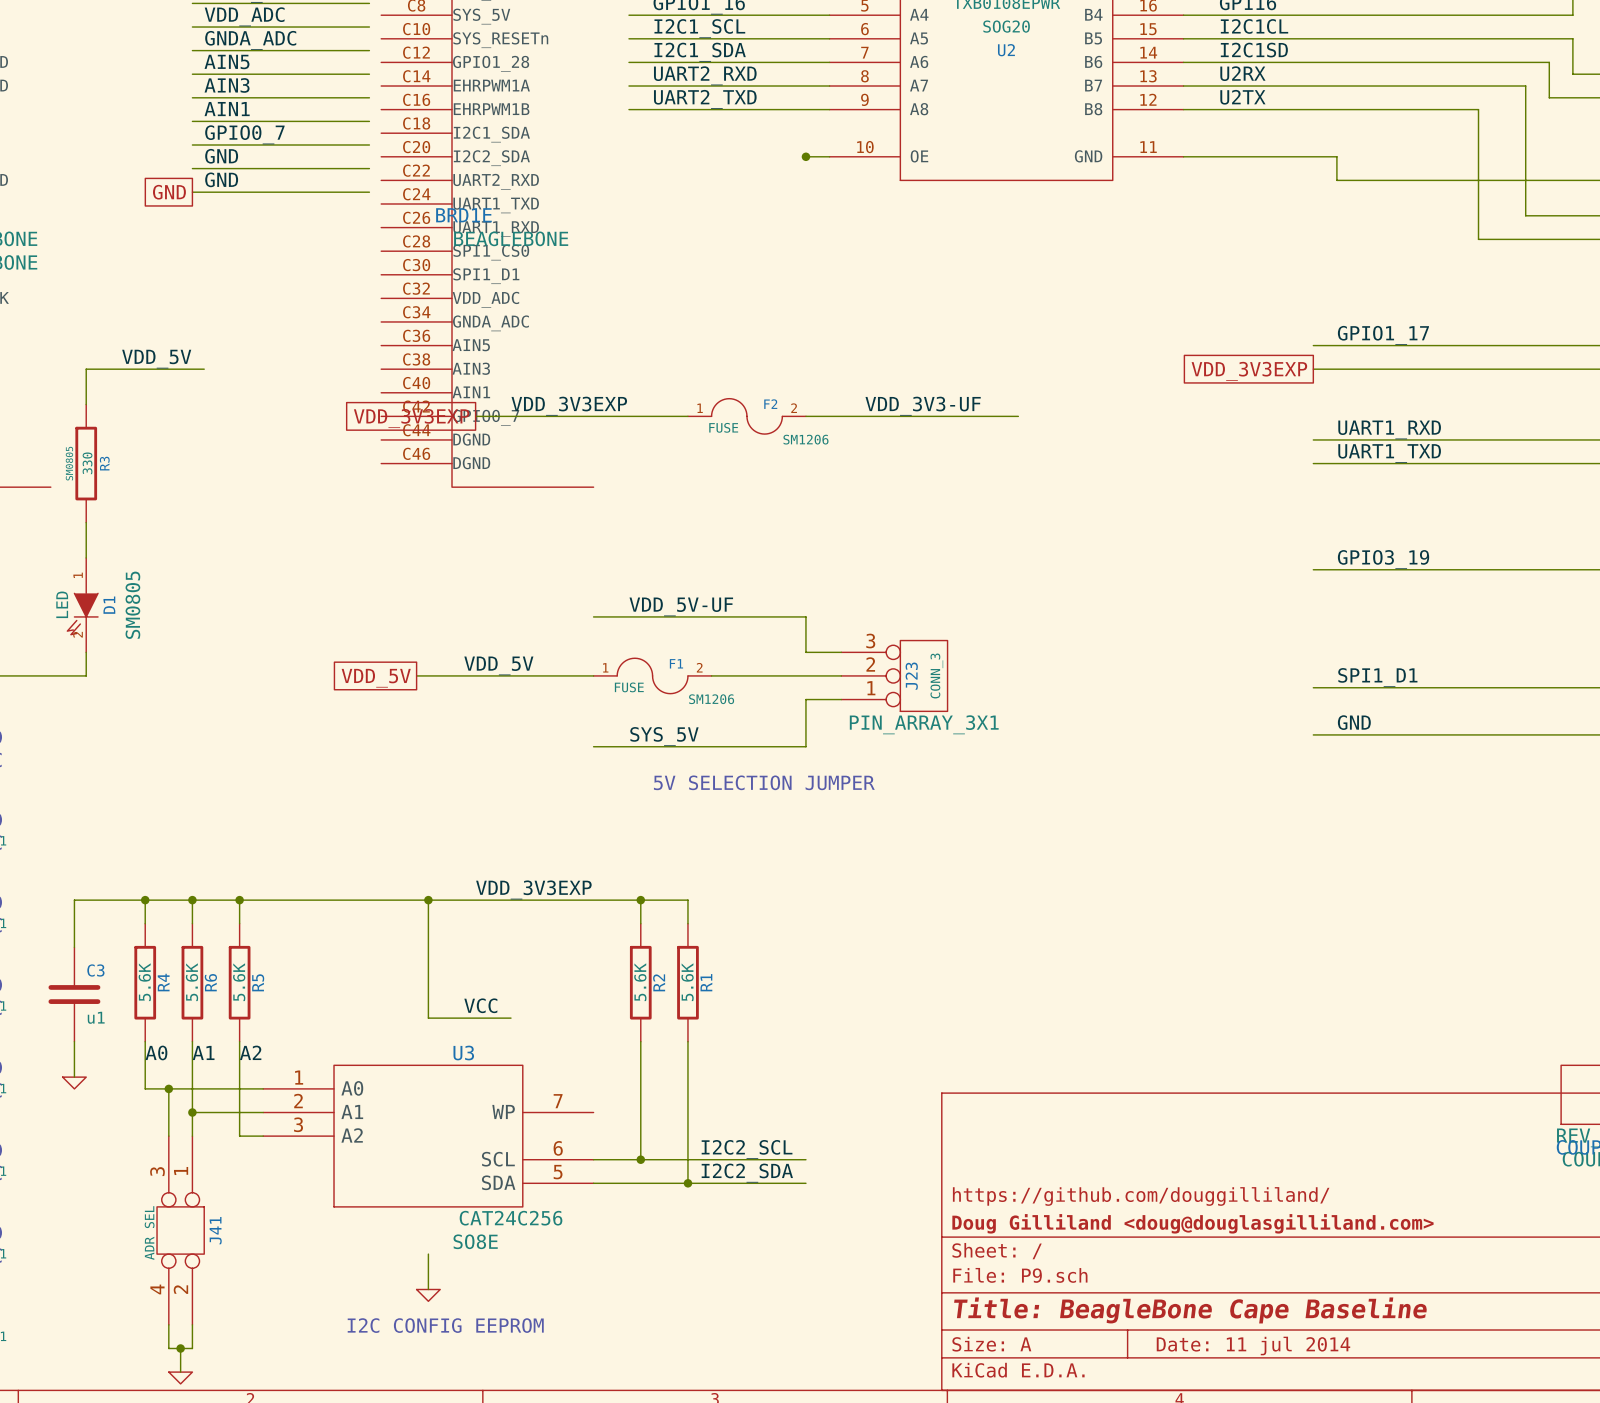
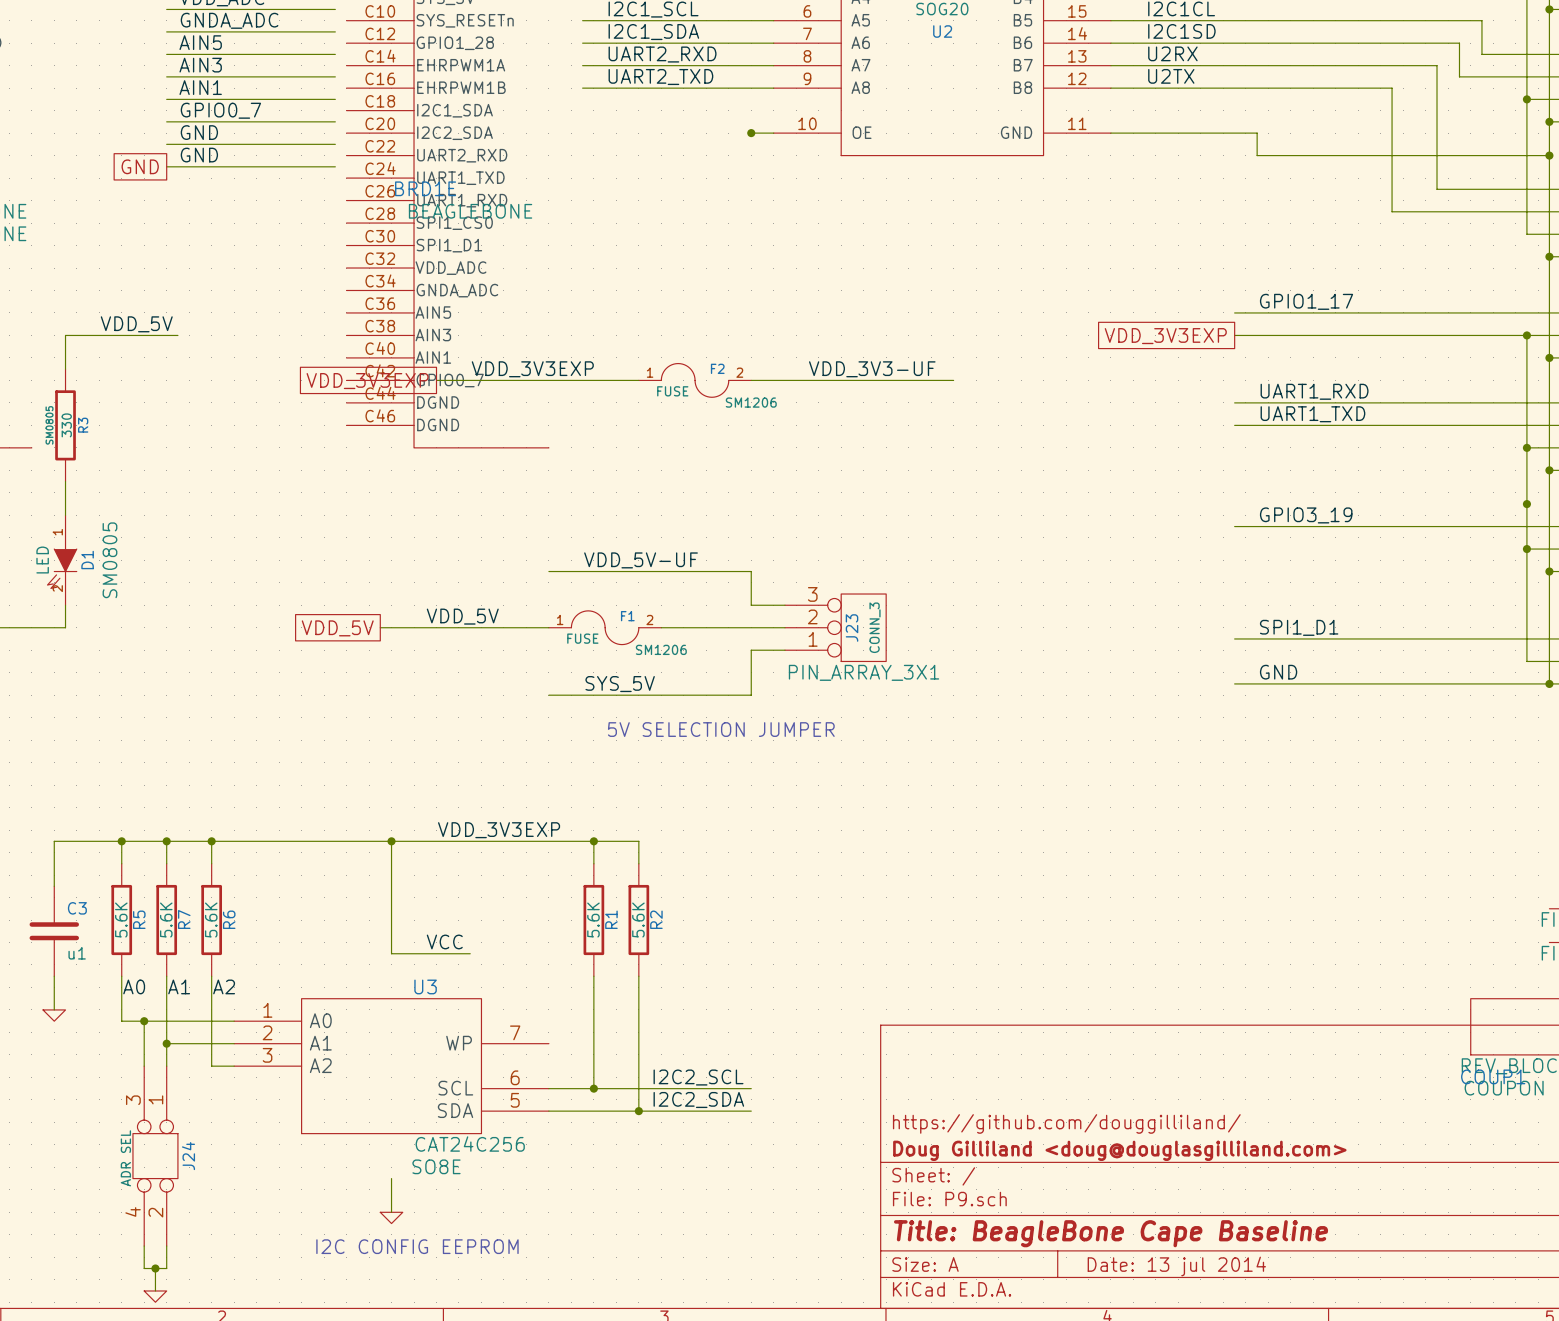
R4 name: R4 (163, 982) -> R5 (139, 919)
R6 name: R6 (210, 982) -> R7 (184, 919)
R5 name: R5 (258, 982) -> R6 (229, 919)
R2 name: R2 (659, 982) -> R1 (611, 919)
R1 name: R1 (706, 982) -> R2 (656, 919)
J41 name: J41 (215, 1230) -> J24 (188, 1156)
title block: Date: 11 jul 2014 (1253, 1345) -> Date: 13 jul 2014 (1176, 1266)

